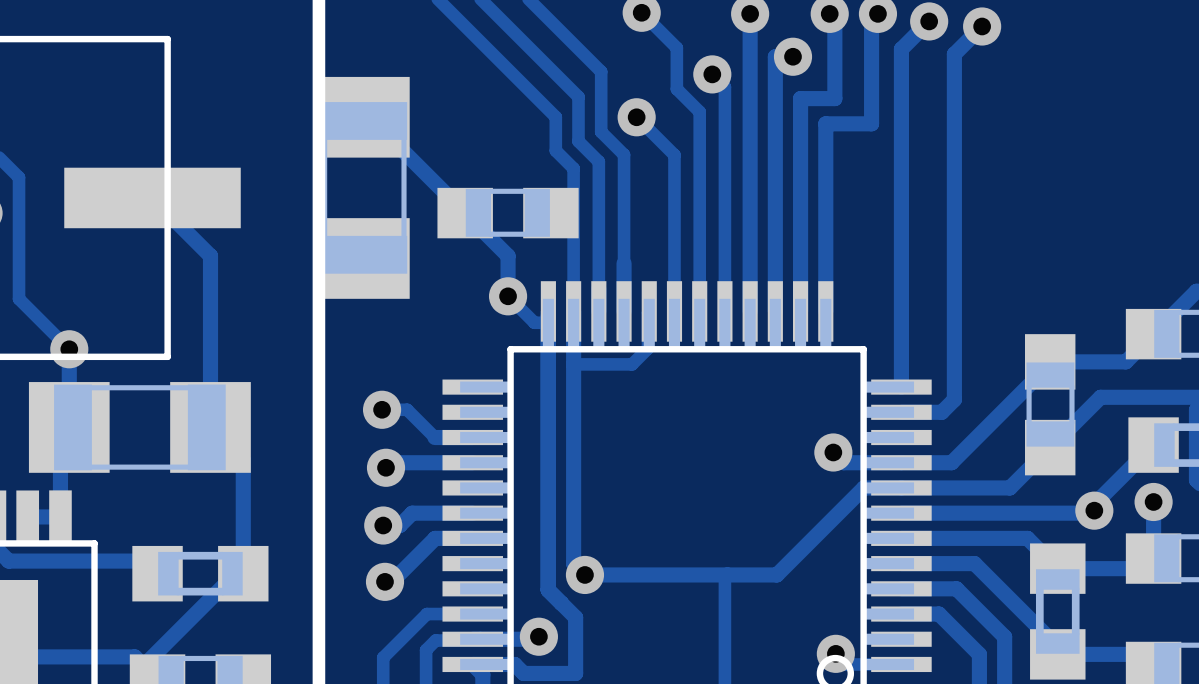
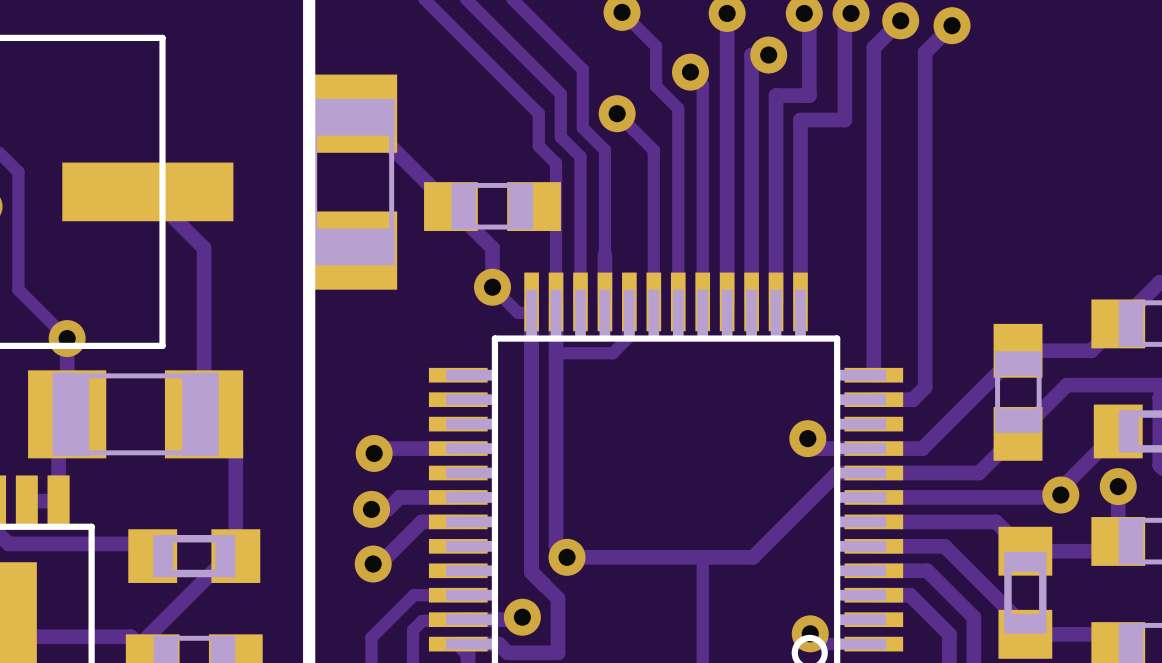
track: (382, 409) (407, 409) (434, 437) (472, 437) -> none
via: (382, 409) -> none

